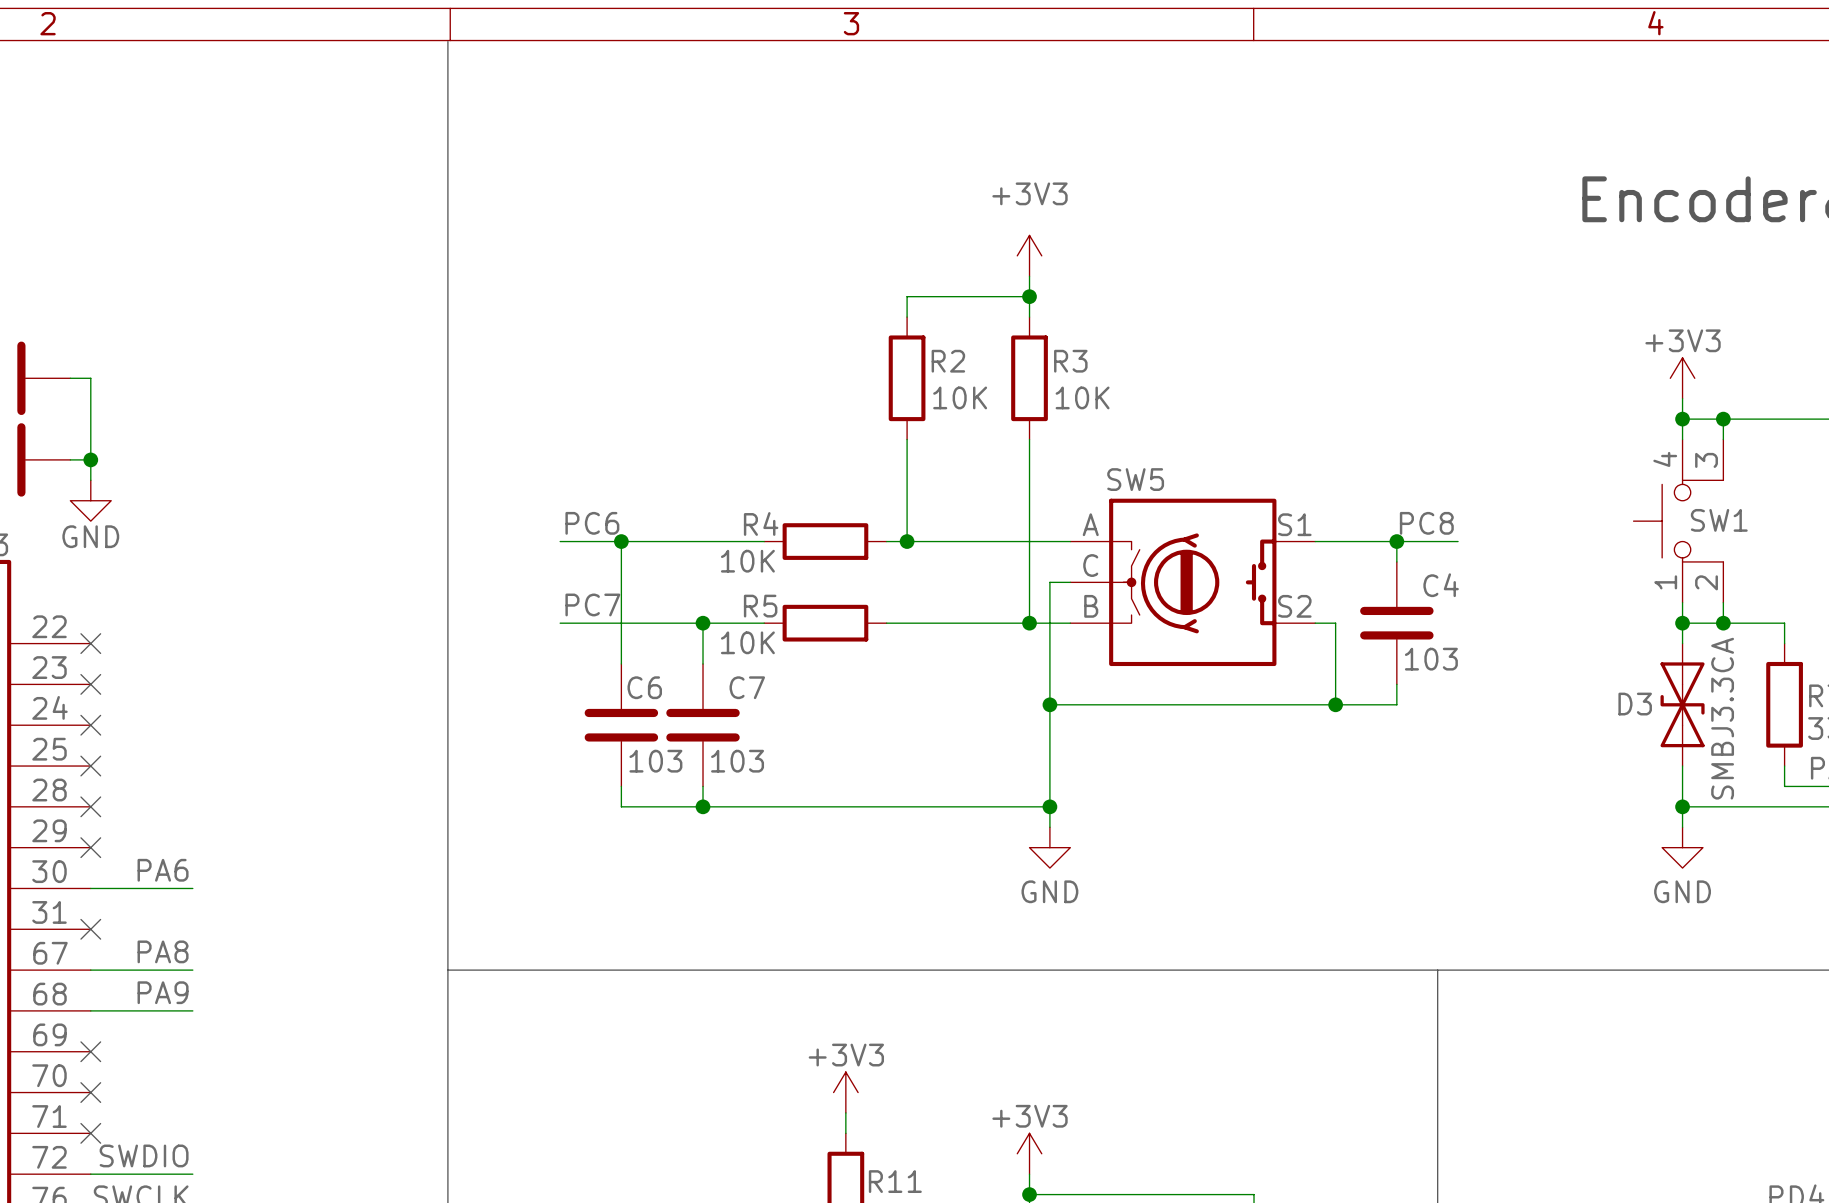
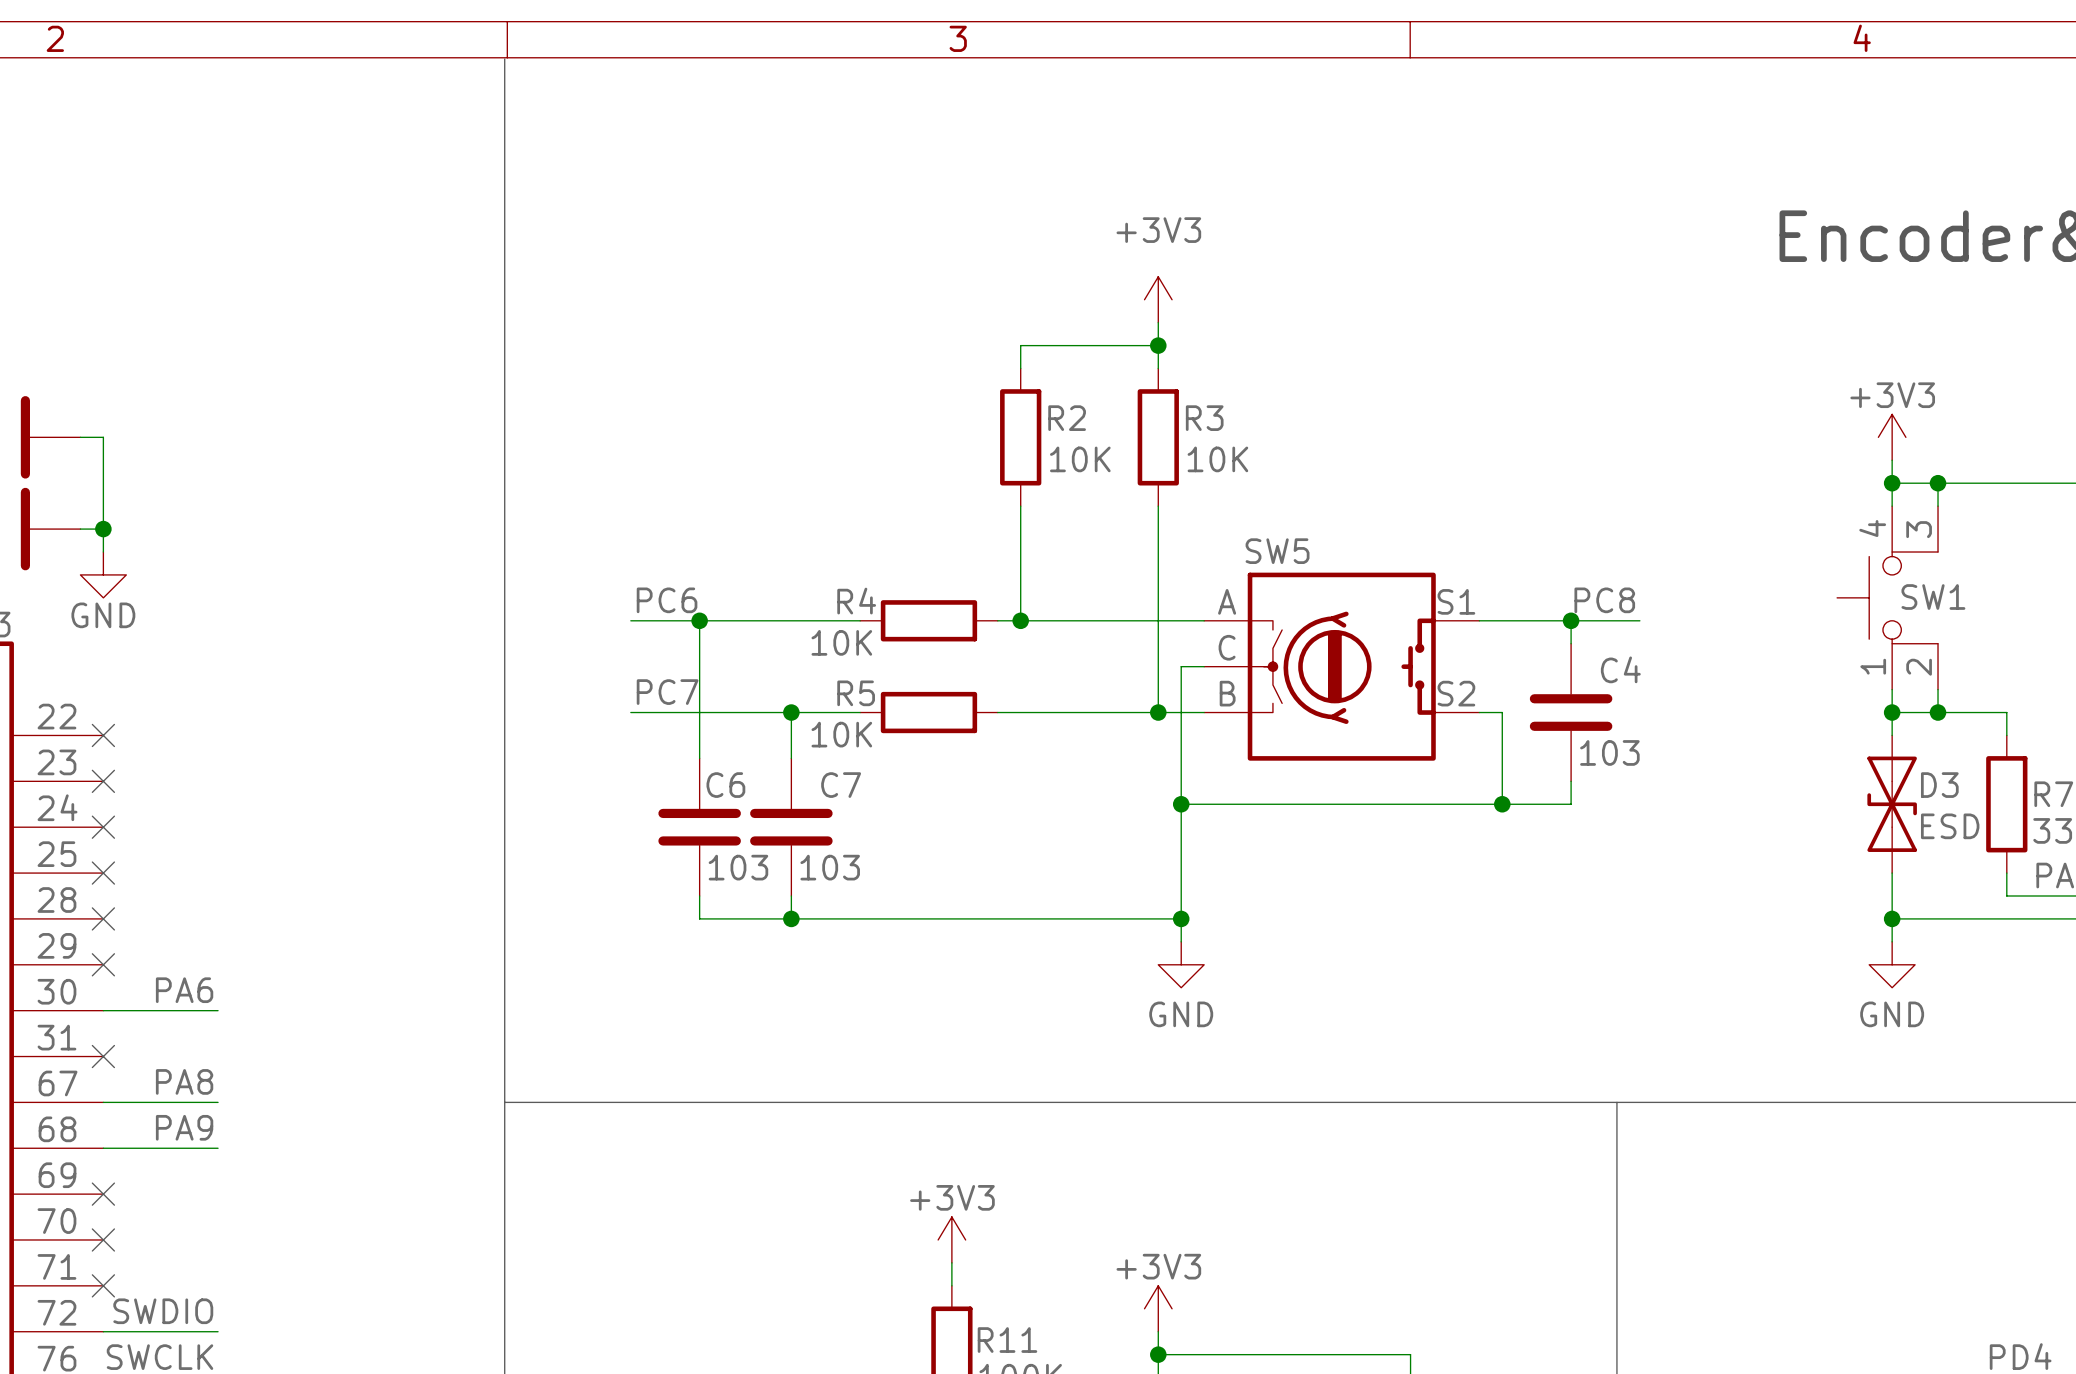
D3 name position: D3 (1635, 704) -> D3 (1939, 785)
D3 value: SMBJ3.3CA (1722, 718) -> ESD (1950, 826)

